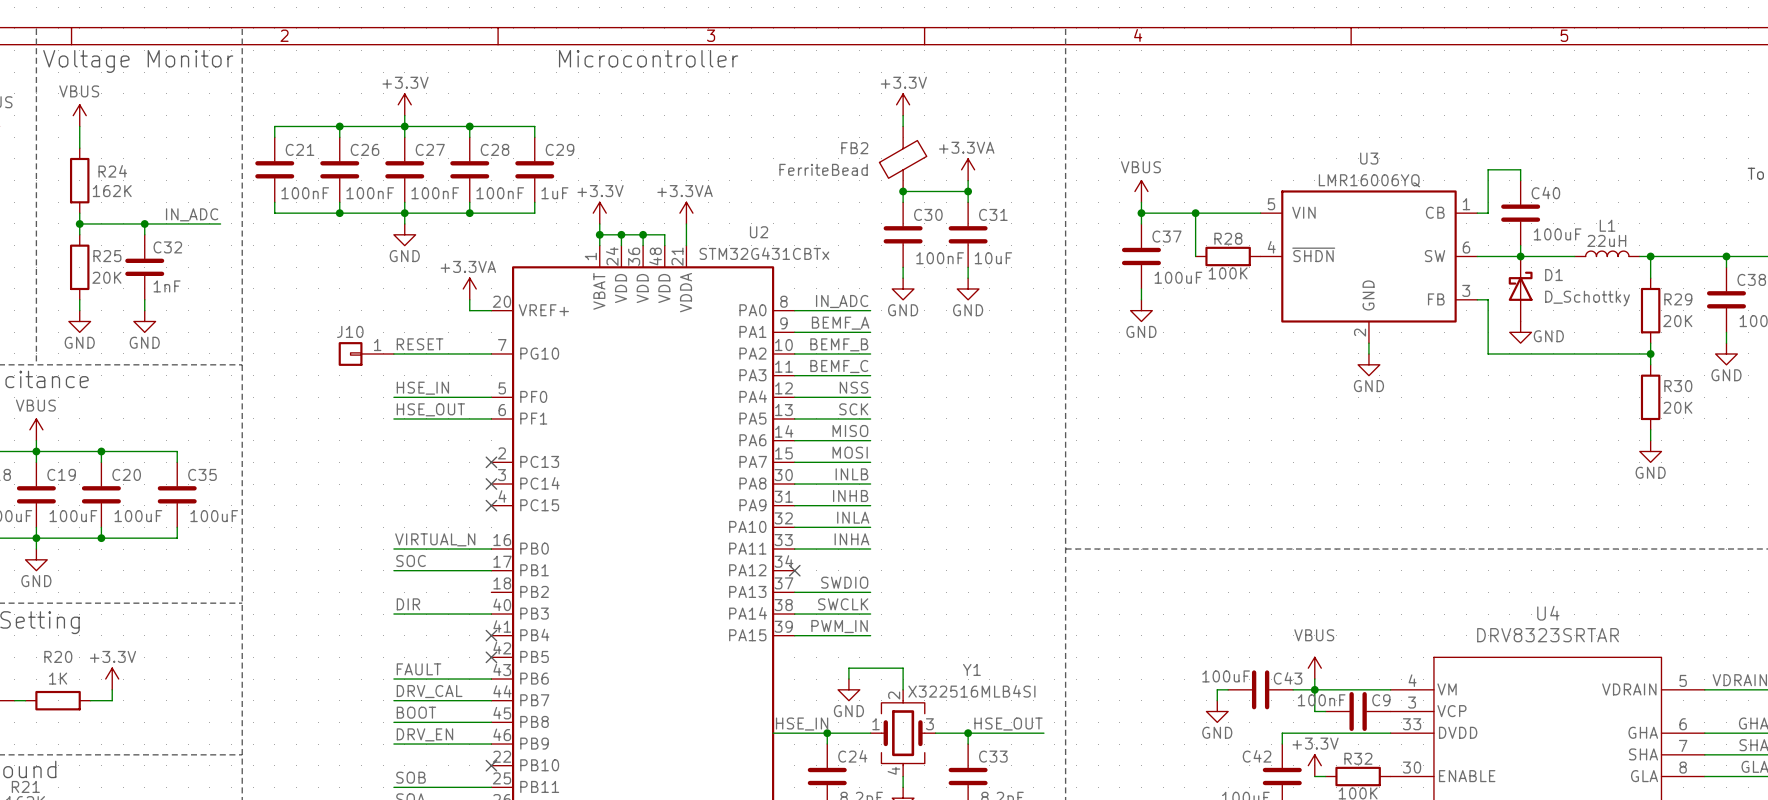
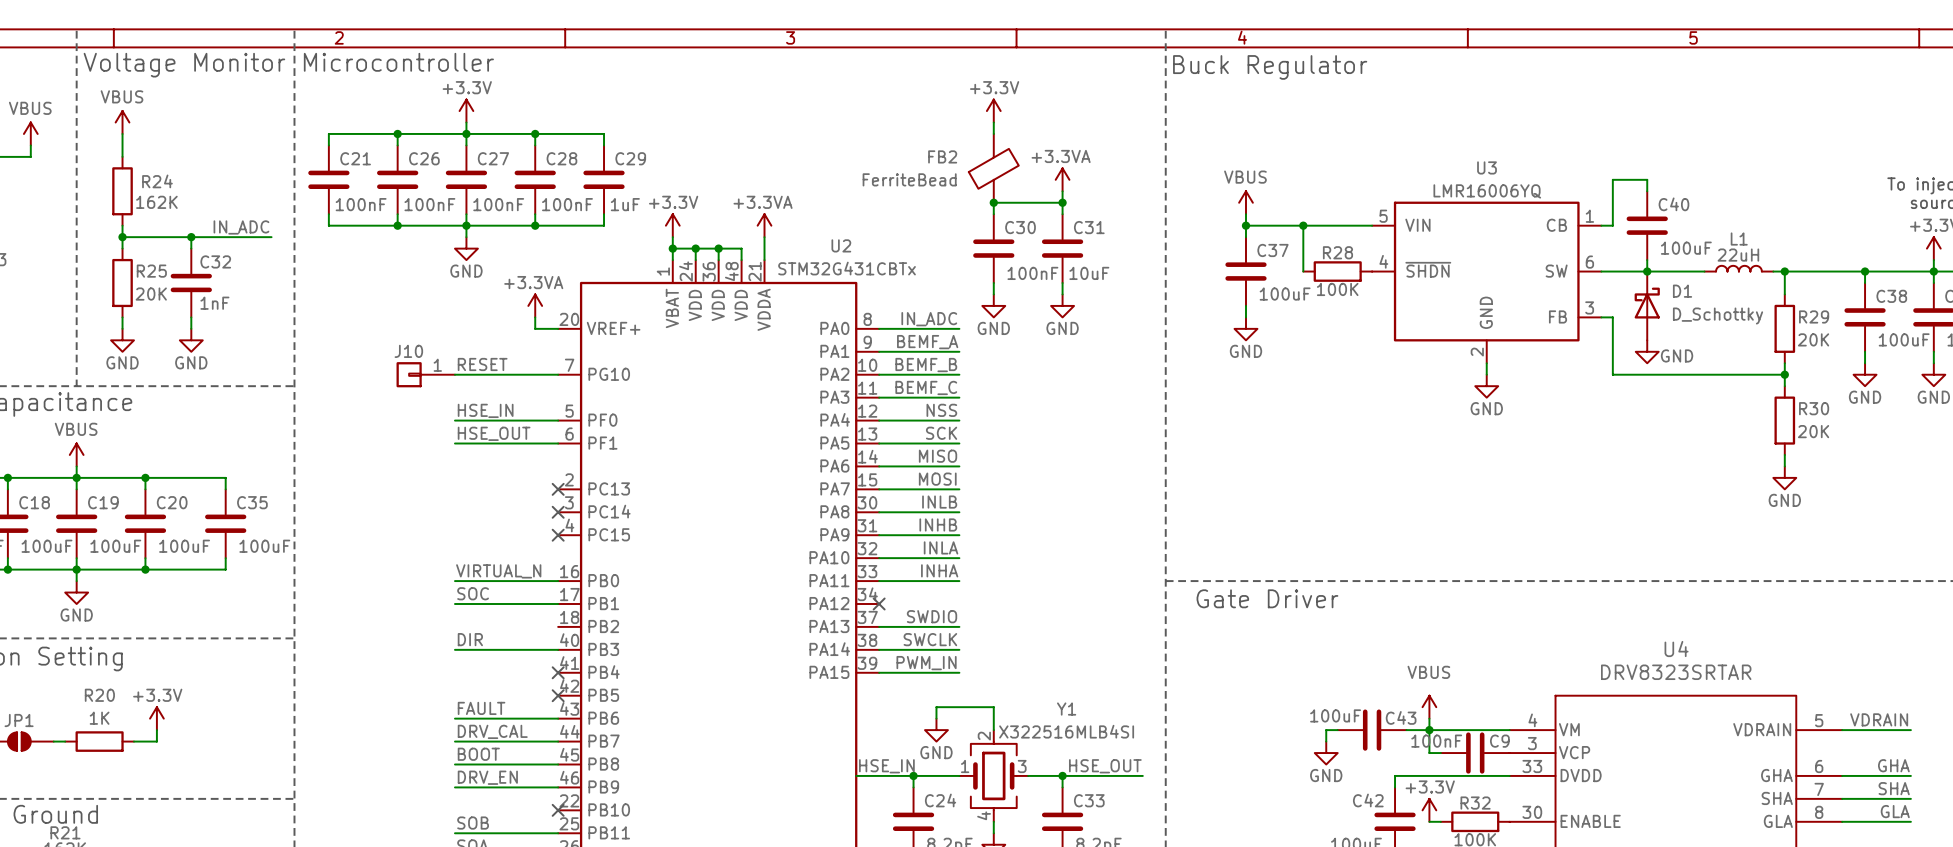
text: none -> Microcontroller (398, 62)
text: Microcontroller (648, 58) -> none
text: none -> Buck Regulator (1270, 67)
text: none -> Gate Driver (1267, 598)

